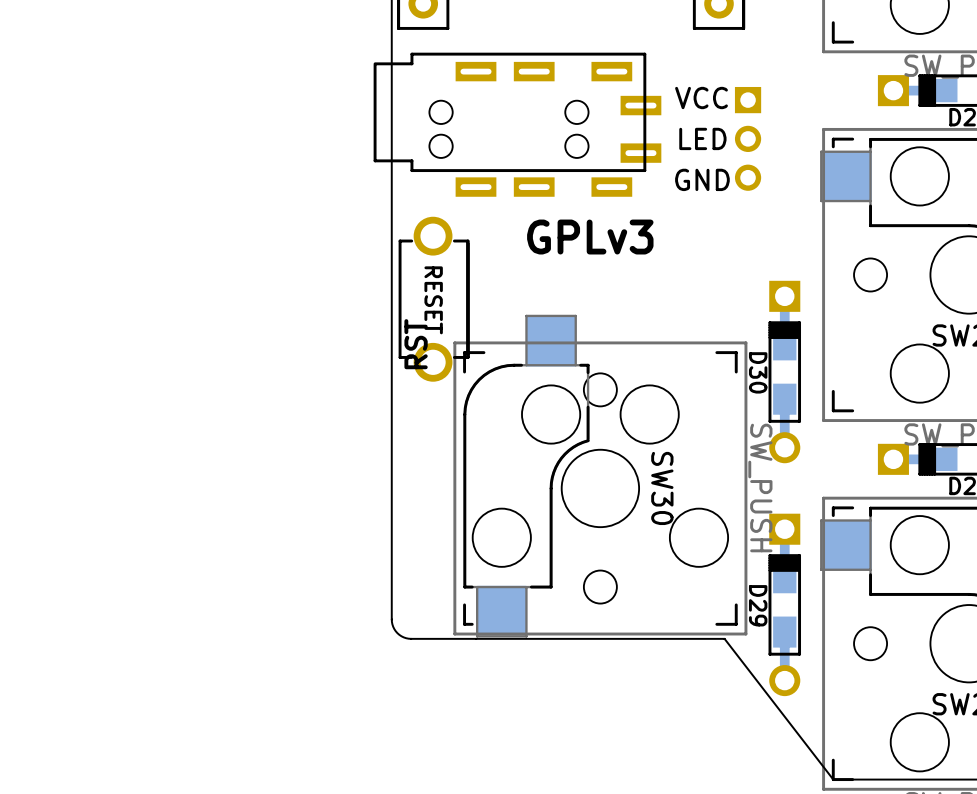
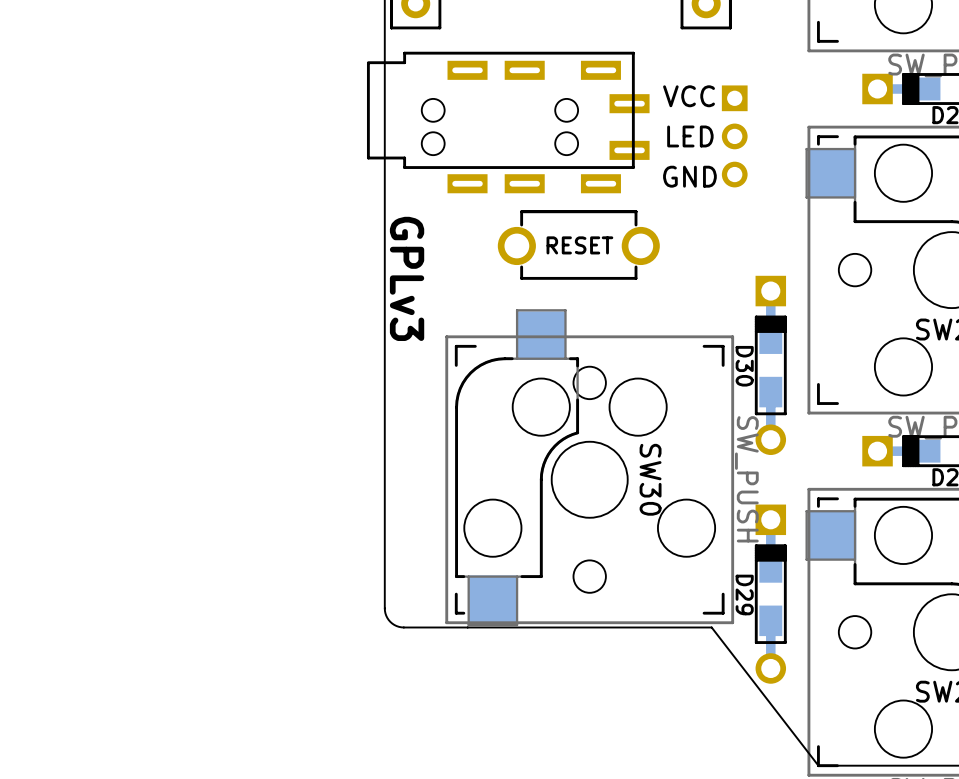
text rotation: 0° (590, 237) -> 90° clockwise (407, 278)
text position: GPLv3 (590, 237) -> GPLv3 (407, 278)
part rotation: 0° (434, 299) -> 90° counterclockwise (578, 245)
part position: (434, 299) -> (578, 245)
text: RST (416, 344) -> none

